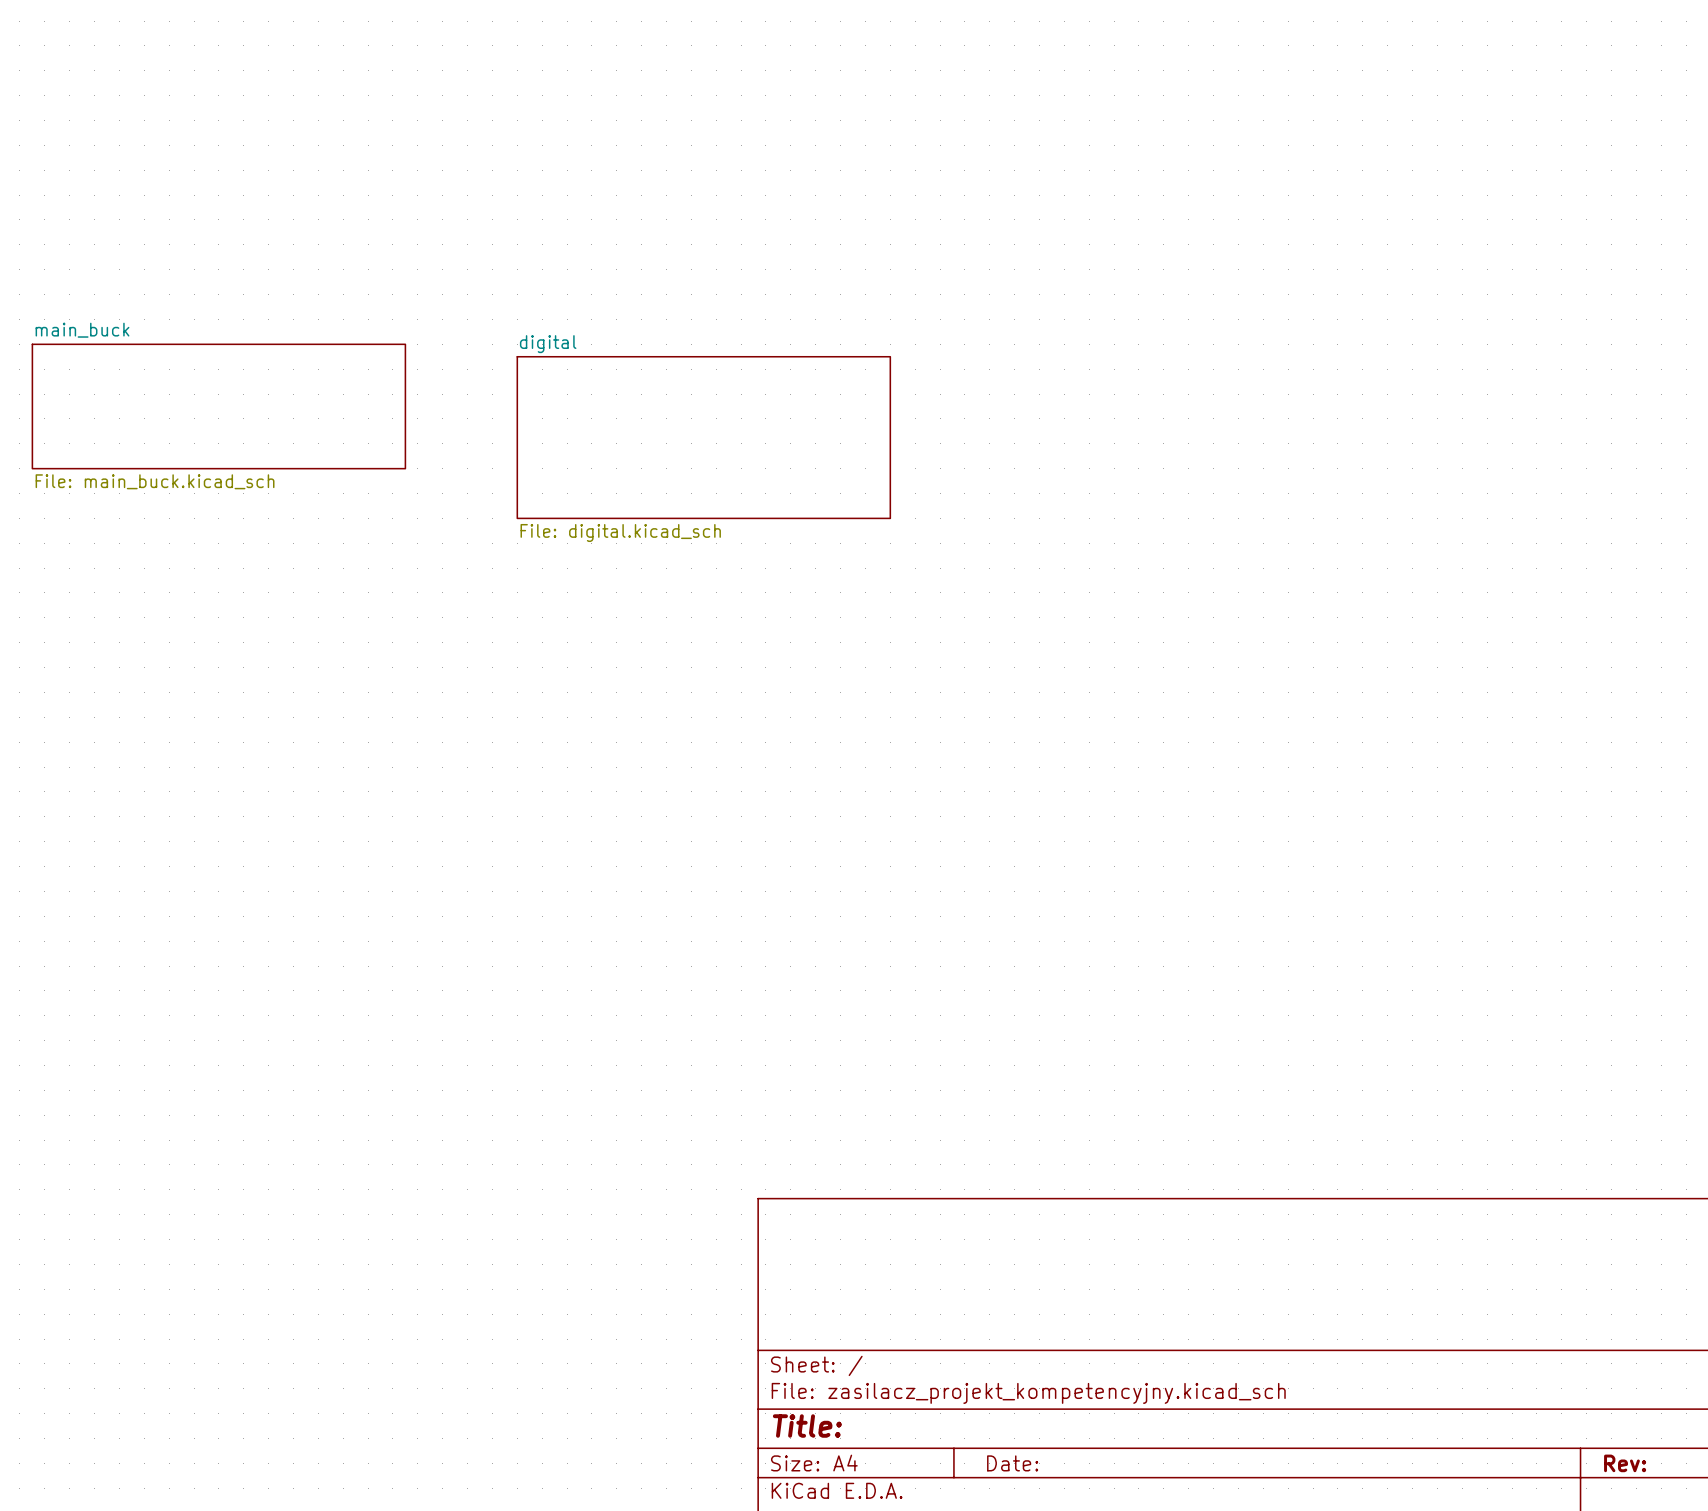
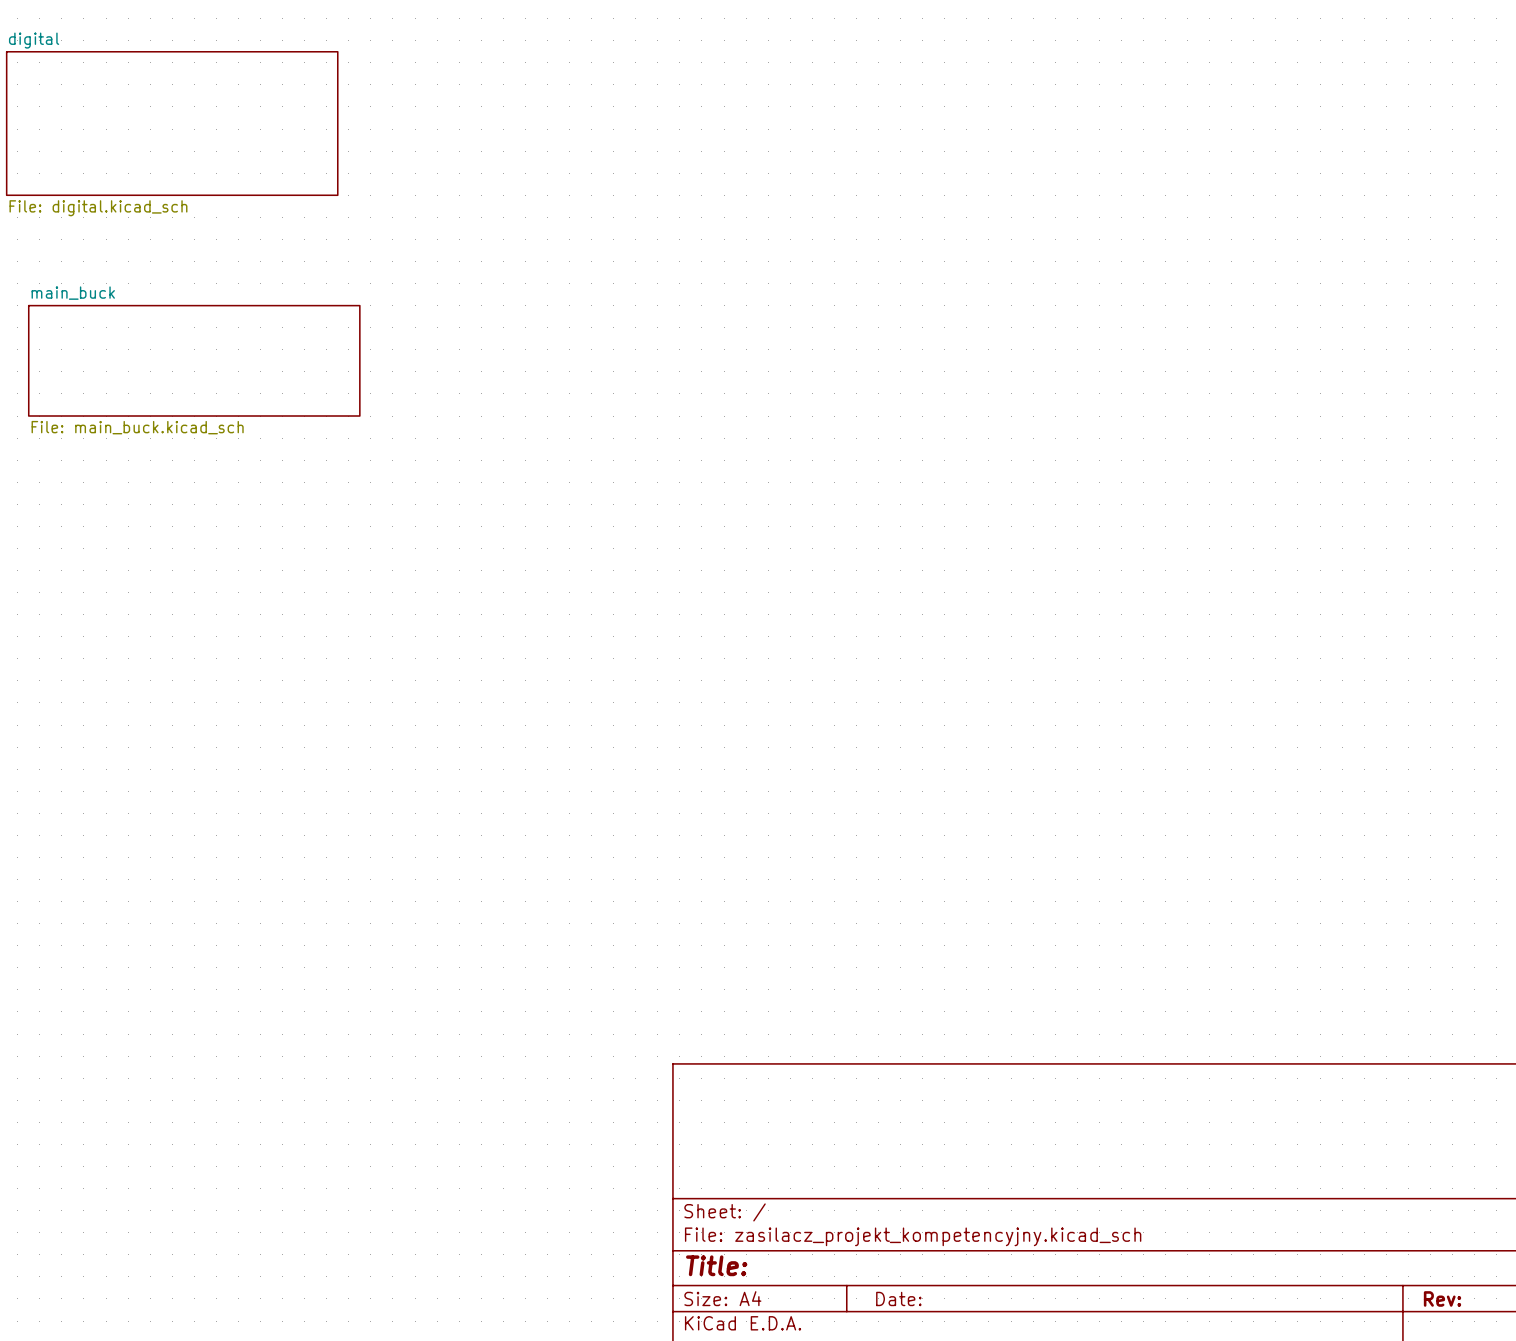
sheet digital: none -> File: digital.kicad_sch (172, 123)
sheet digital: File: digital.kicad_sch (703, 437) -> none

